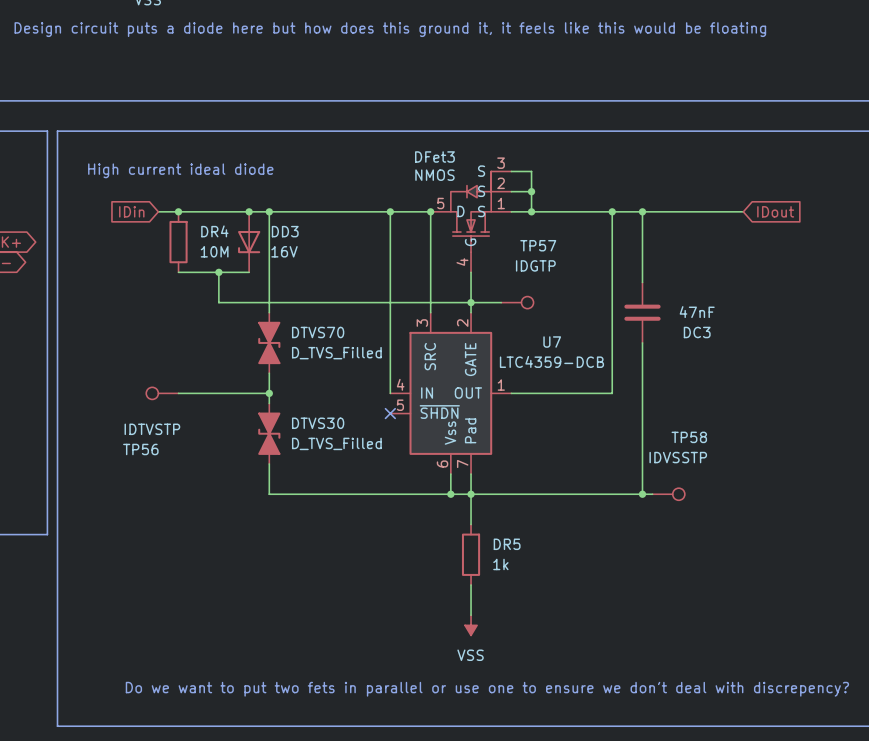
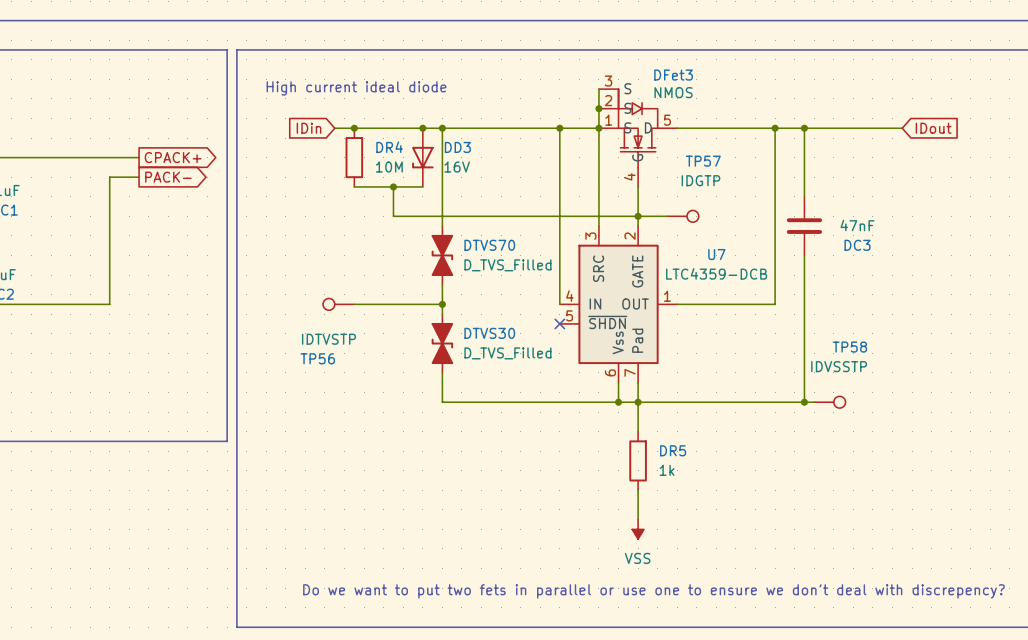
wire: none -> (598, 89) (598, 128)
wire: (511, 171) (531, 171) (531, 211) -> none
junction: none -> (598, 108)
wire: (511, 191) (531, 191) -> none
junction: (531, 191) -> none
DFet3 flip: as is (471, 211) -> left-right (638, 128)
junction: (531, 211) -> none

